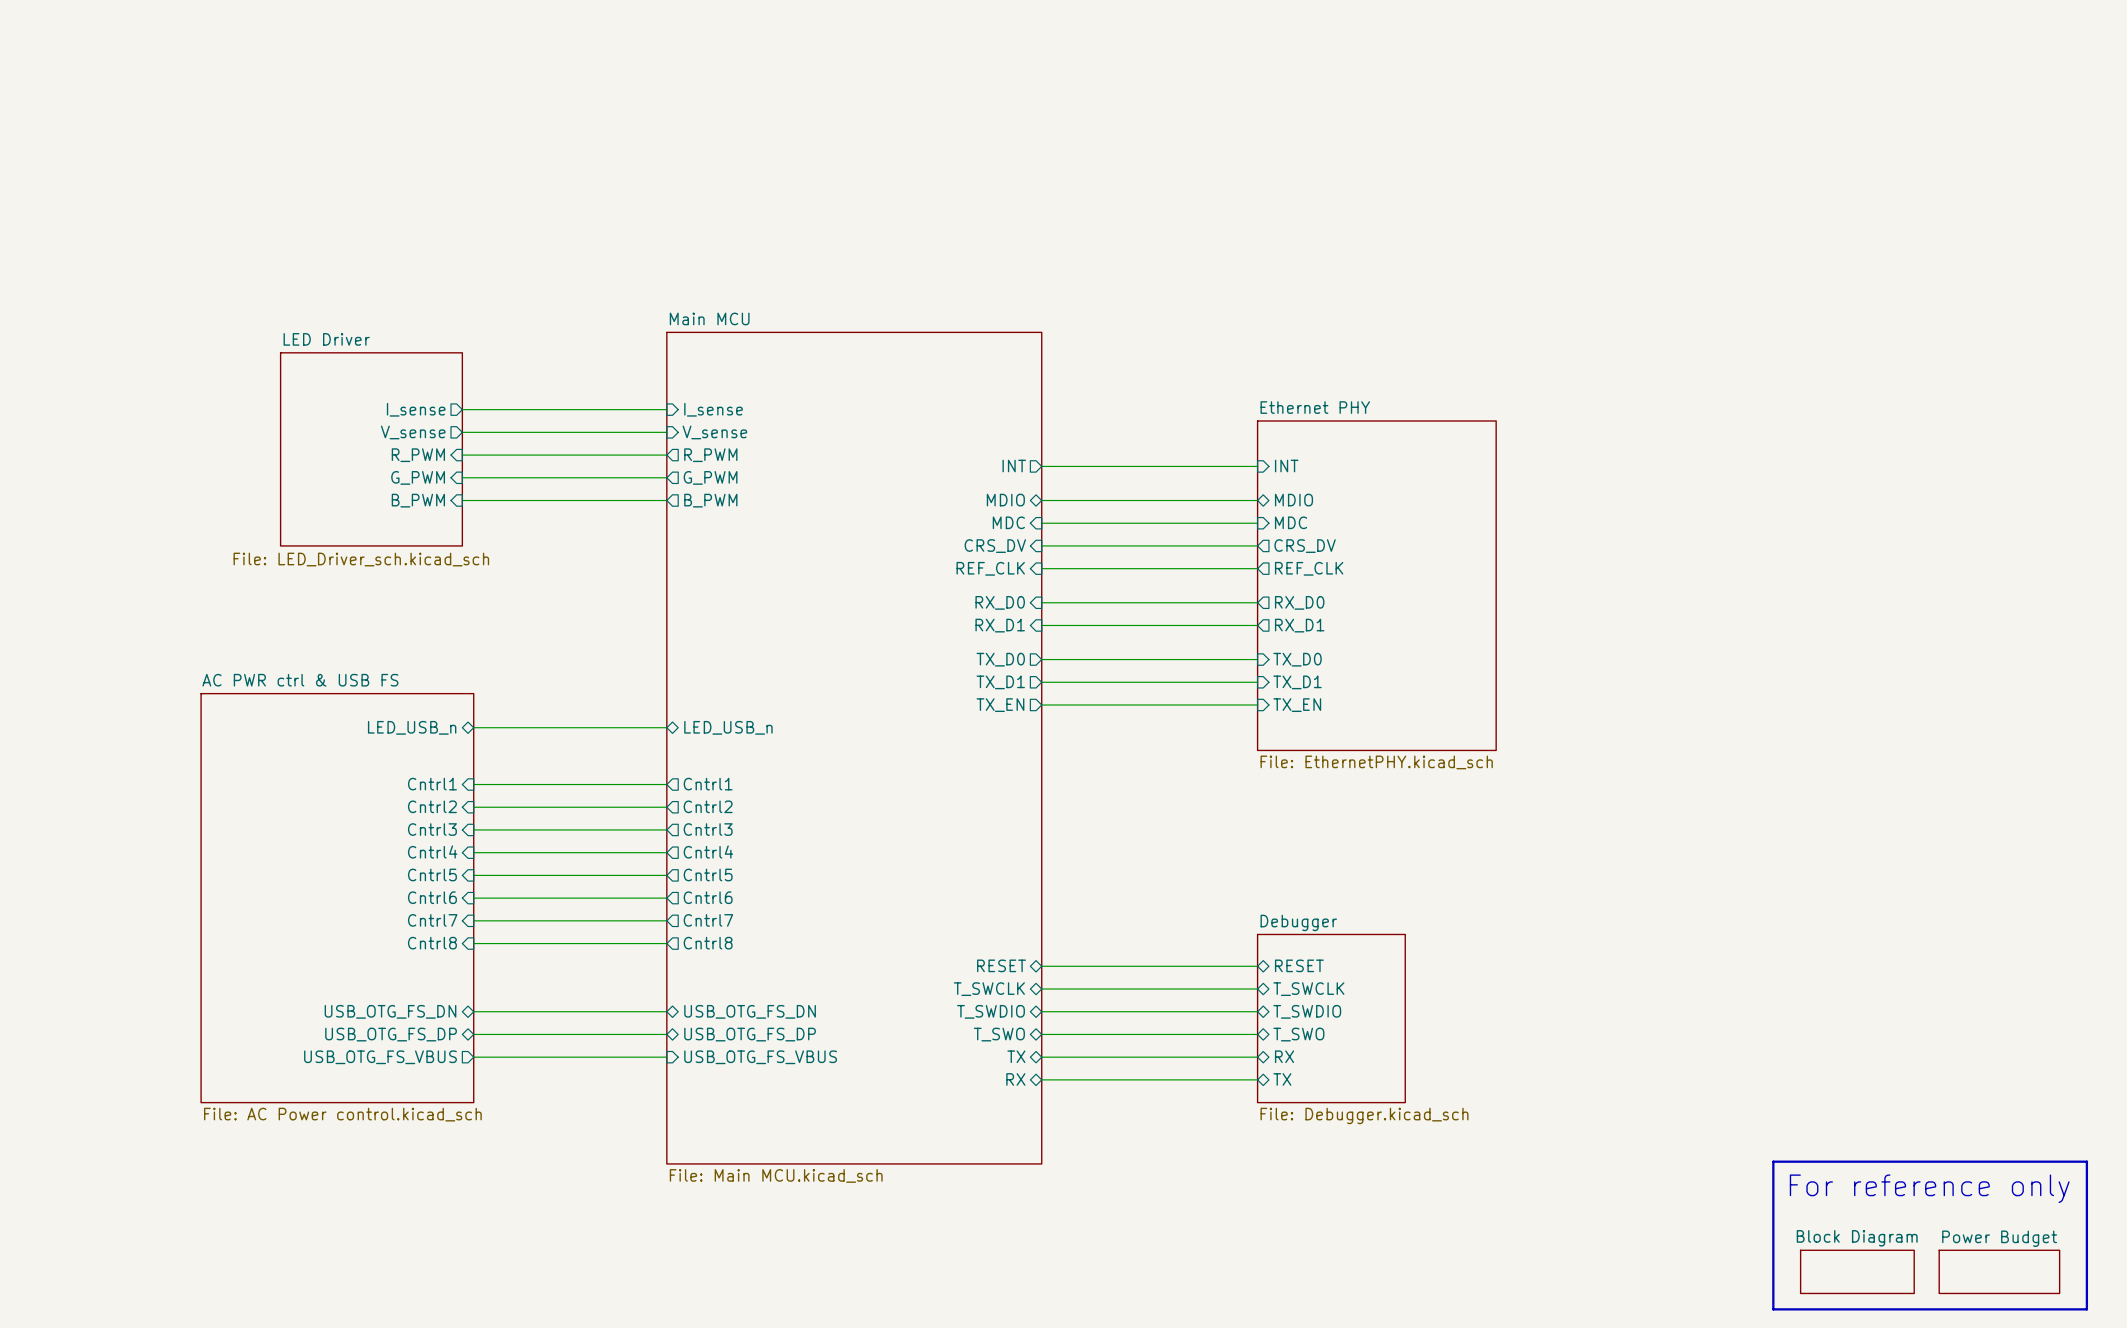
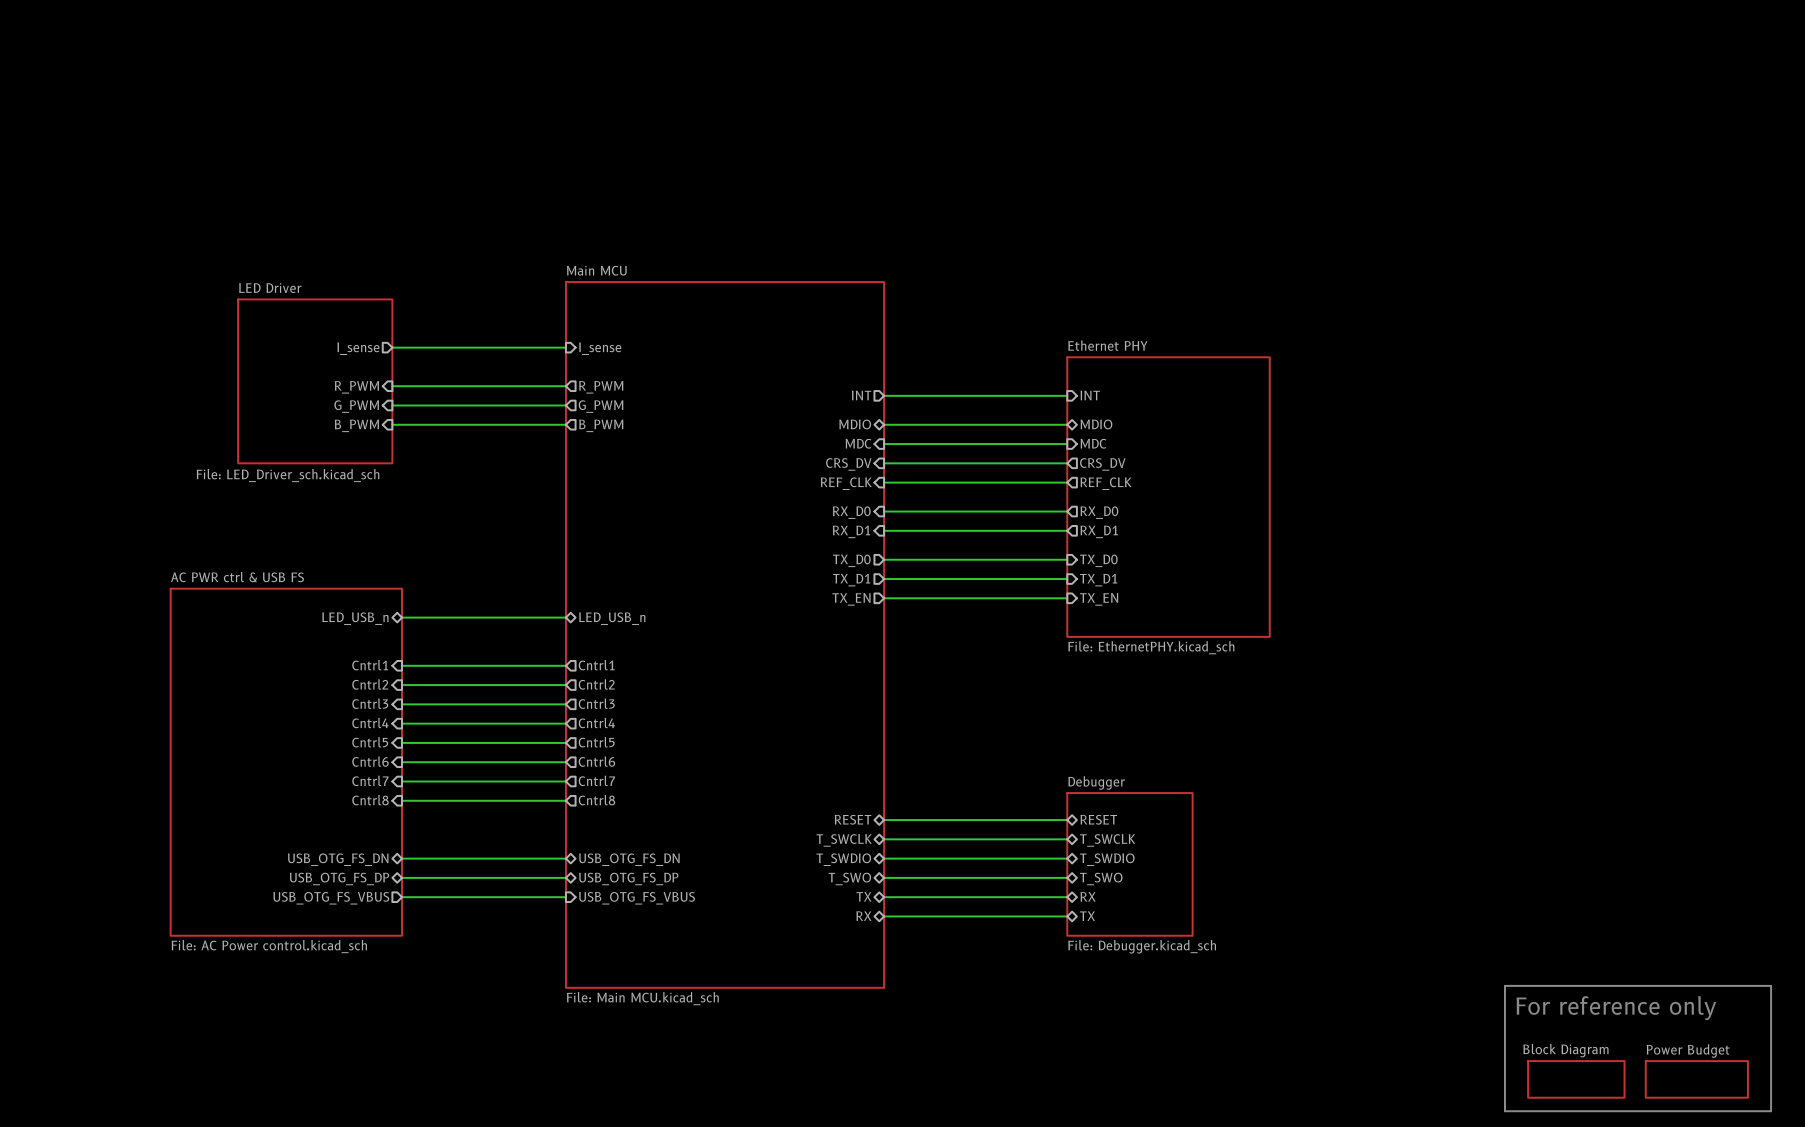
sheet pin: V_sense (413, 432) -> none
wire: (462, 432) (666, 432) -> none
sheet pin: V_sense (714, 432) -> none

